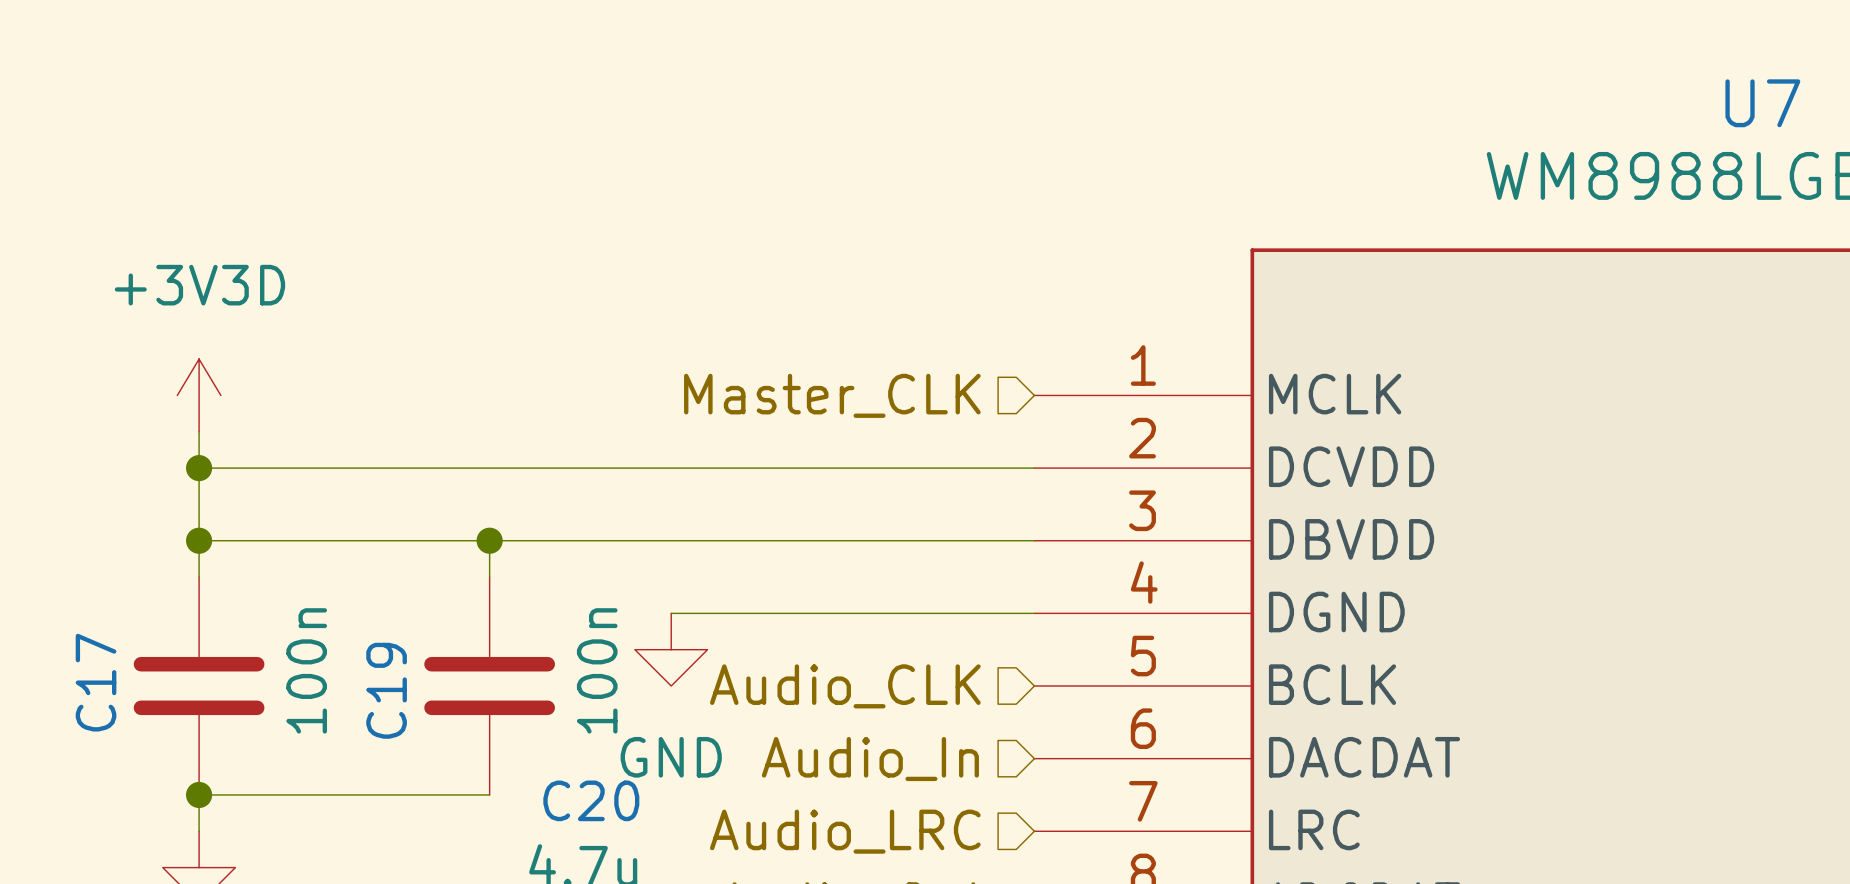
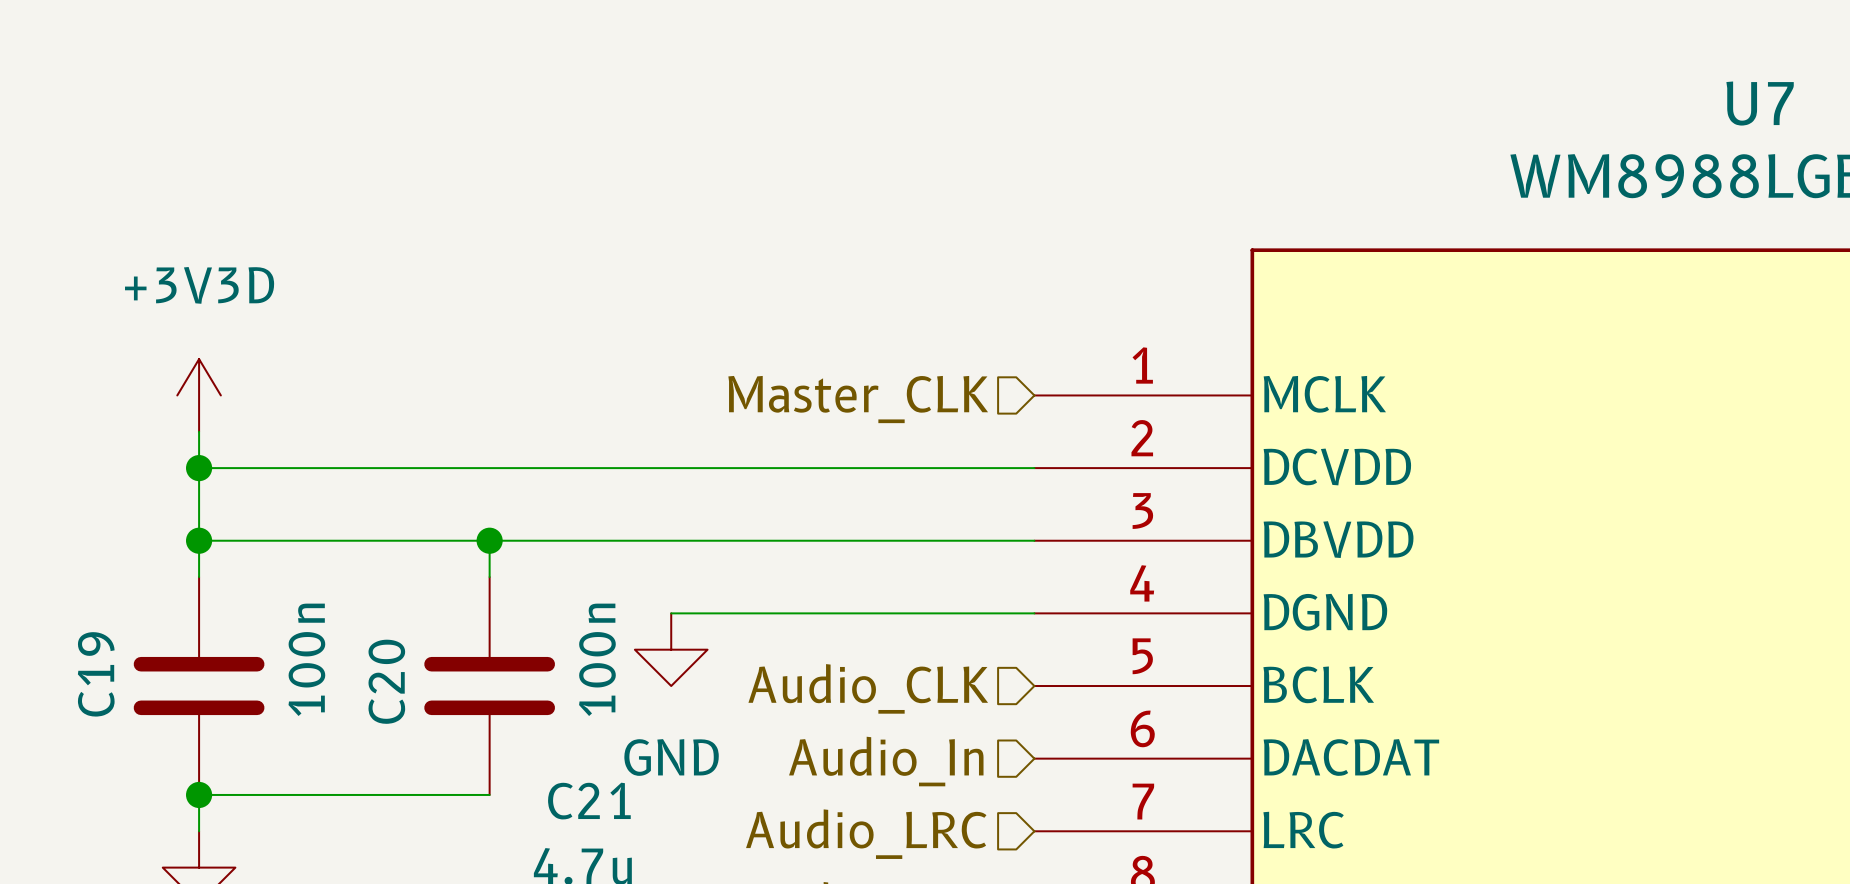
C17 name: C17 (96, 682) -> C19 (96, 674)
C19 name: C19 (386, 690) -> C20 (386, 681)
C20 name: C20 (591, 800) -> C21 (589, 801)

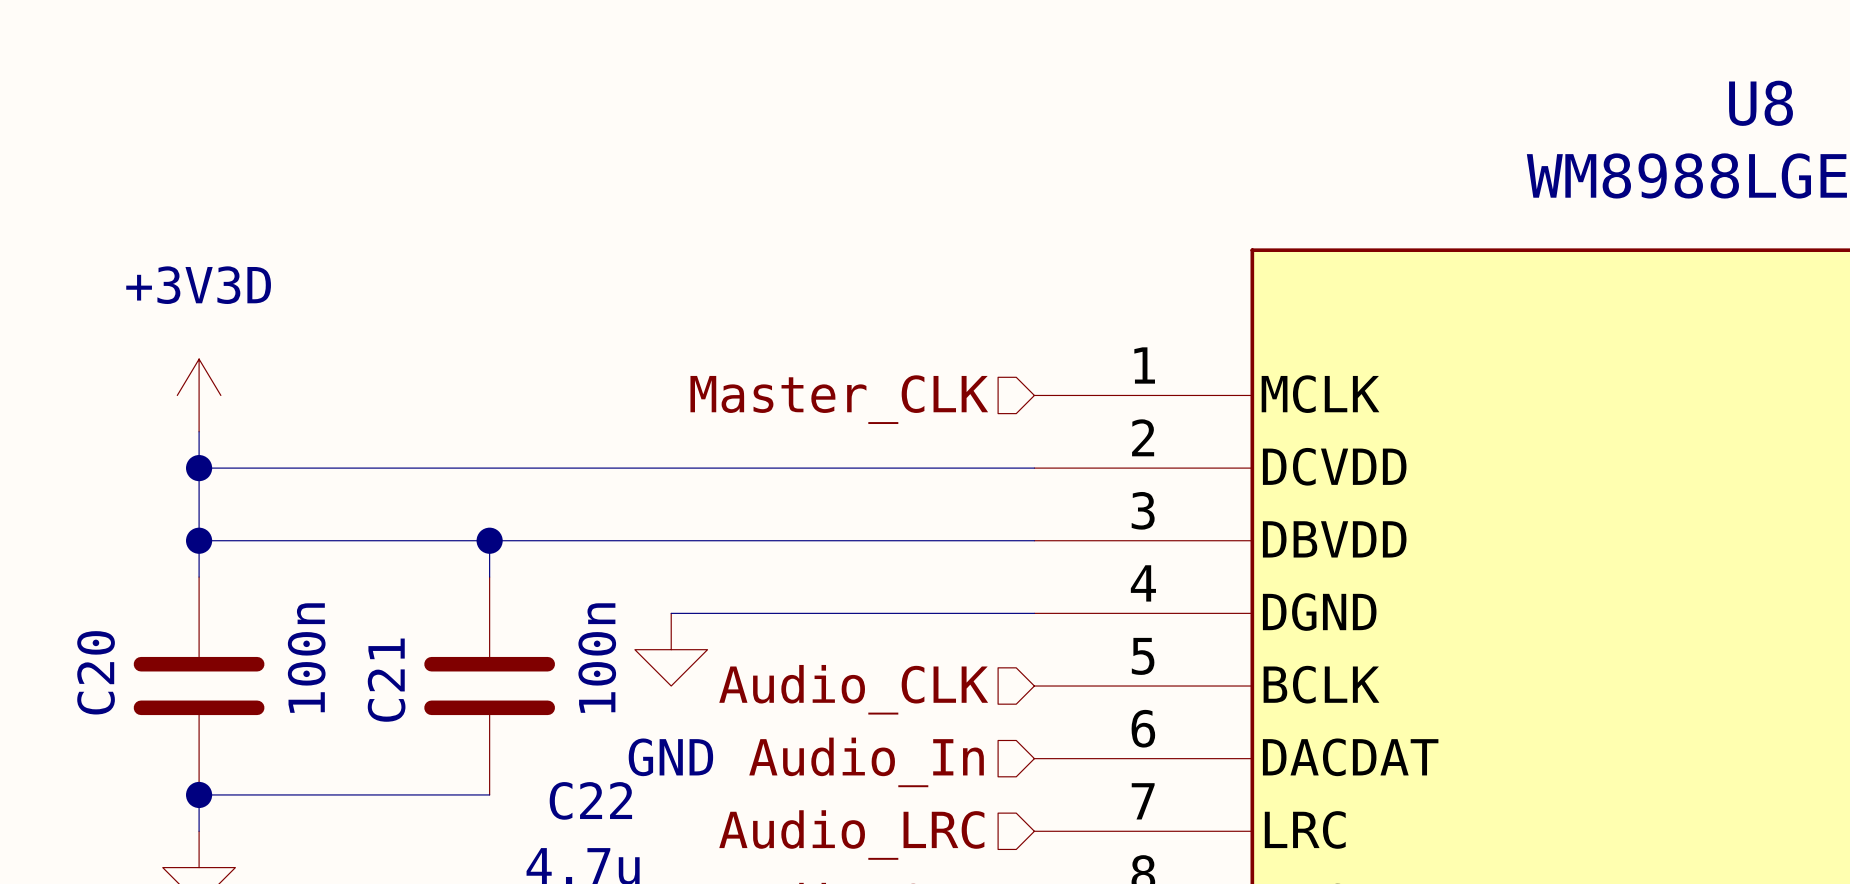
U7 name: U7 (1760, 103) -> U8 (1761, 103)
C19 name: C19 (96, 674) -> C20 (96, 672)
C20 name: C20 (386, 681) -> C21 (386, 680)
C21 name: C21 (589, 801) -> C22 (590, 800)

